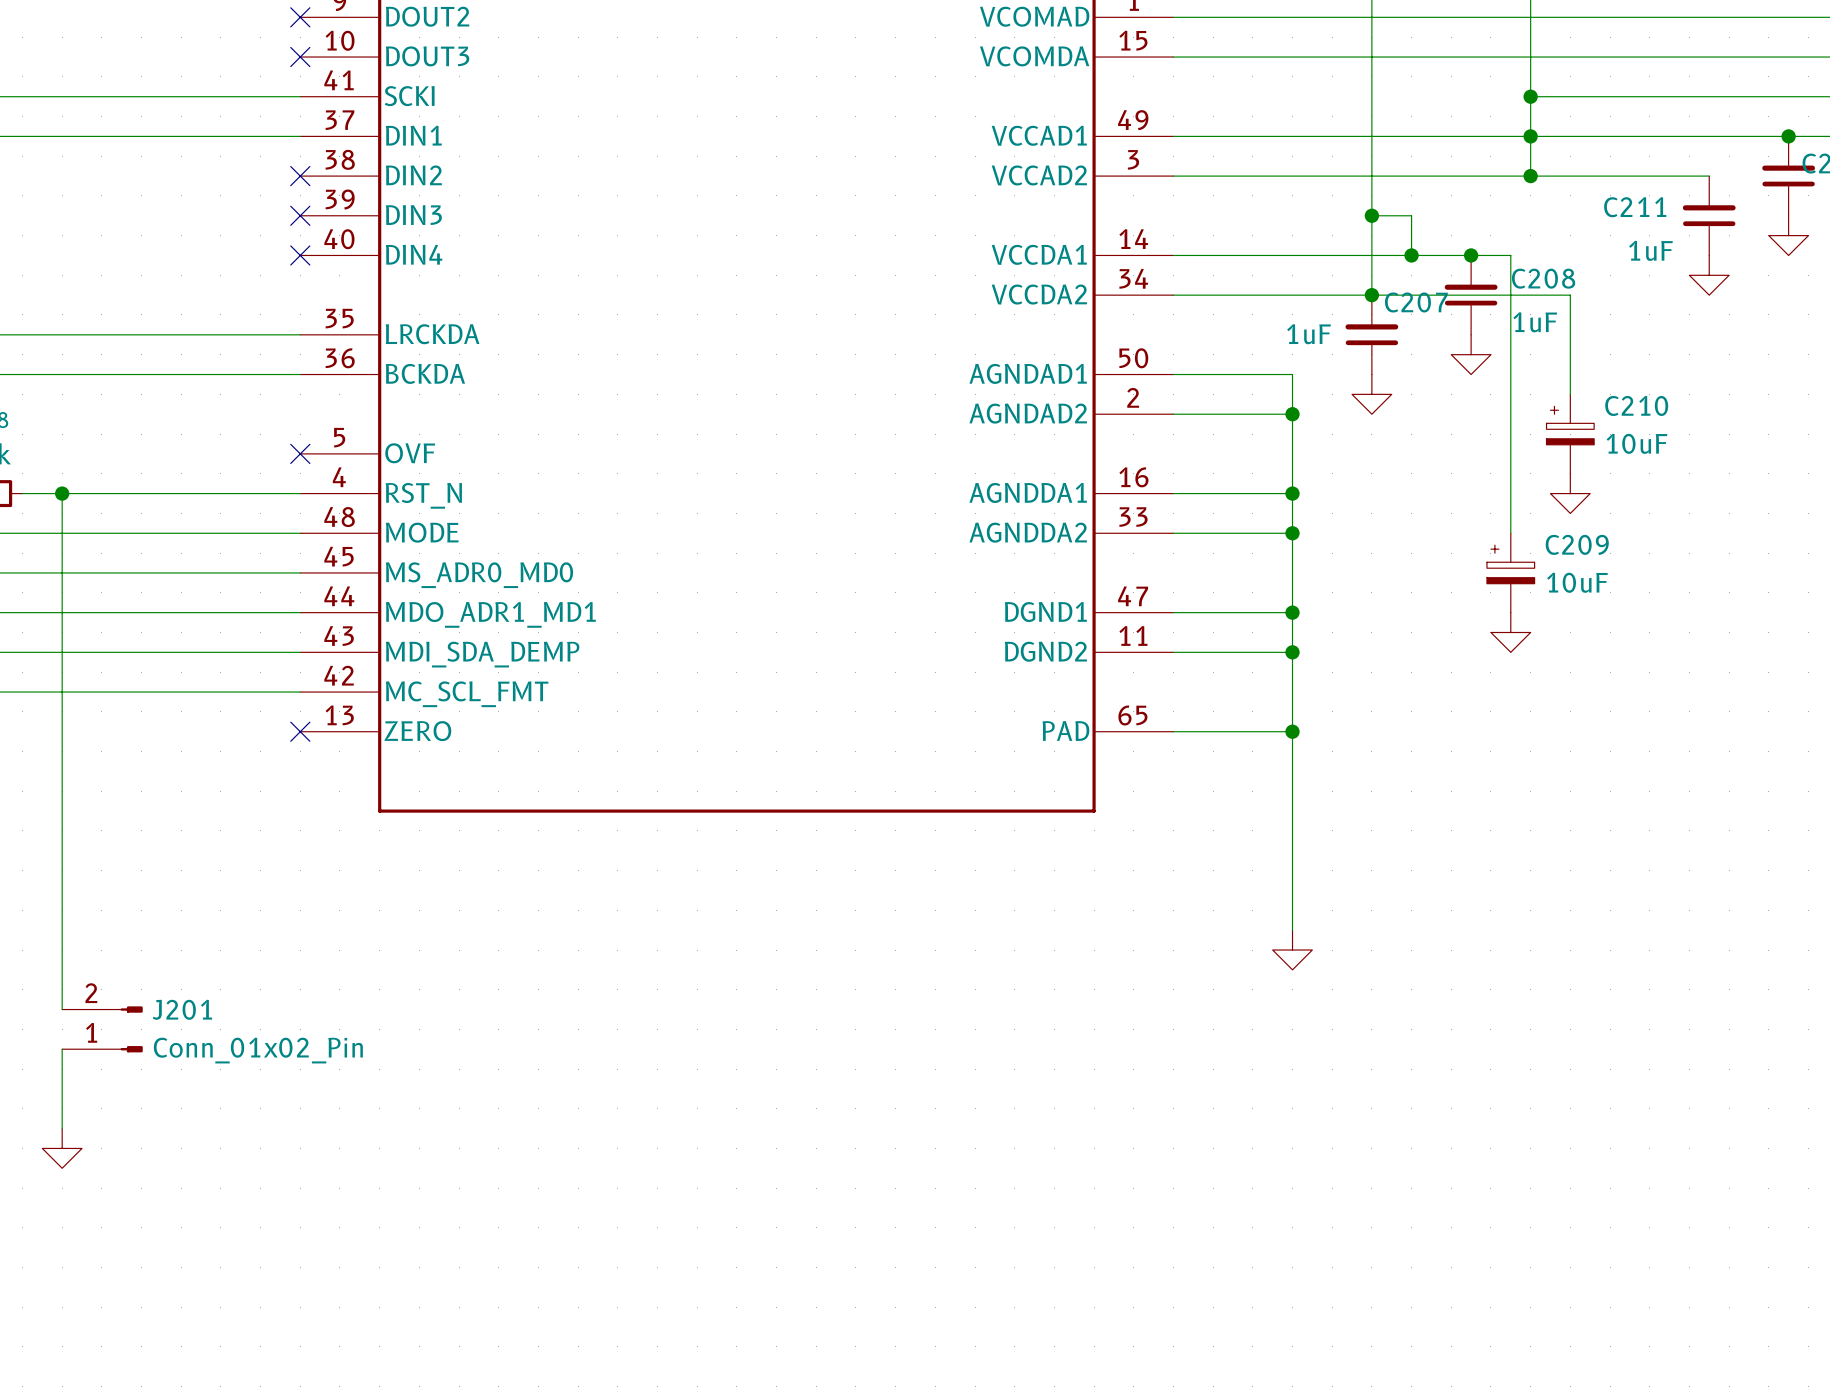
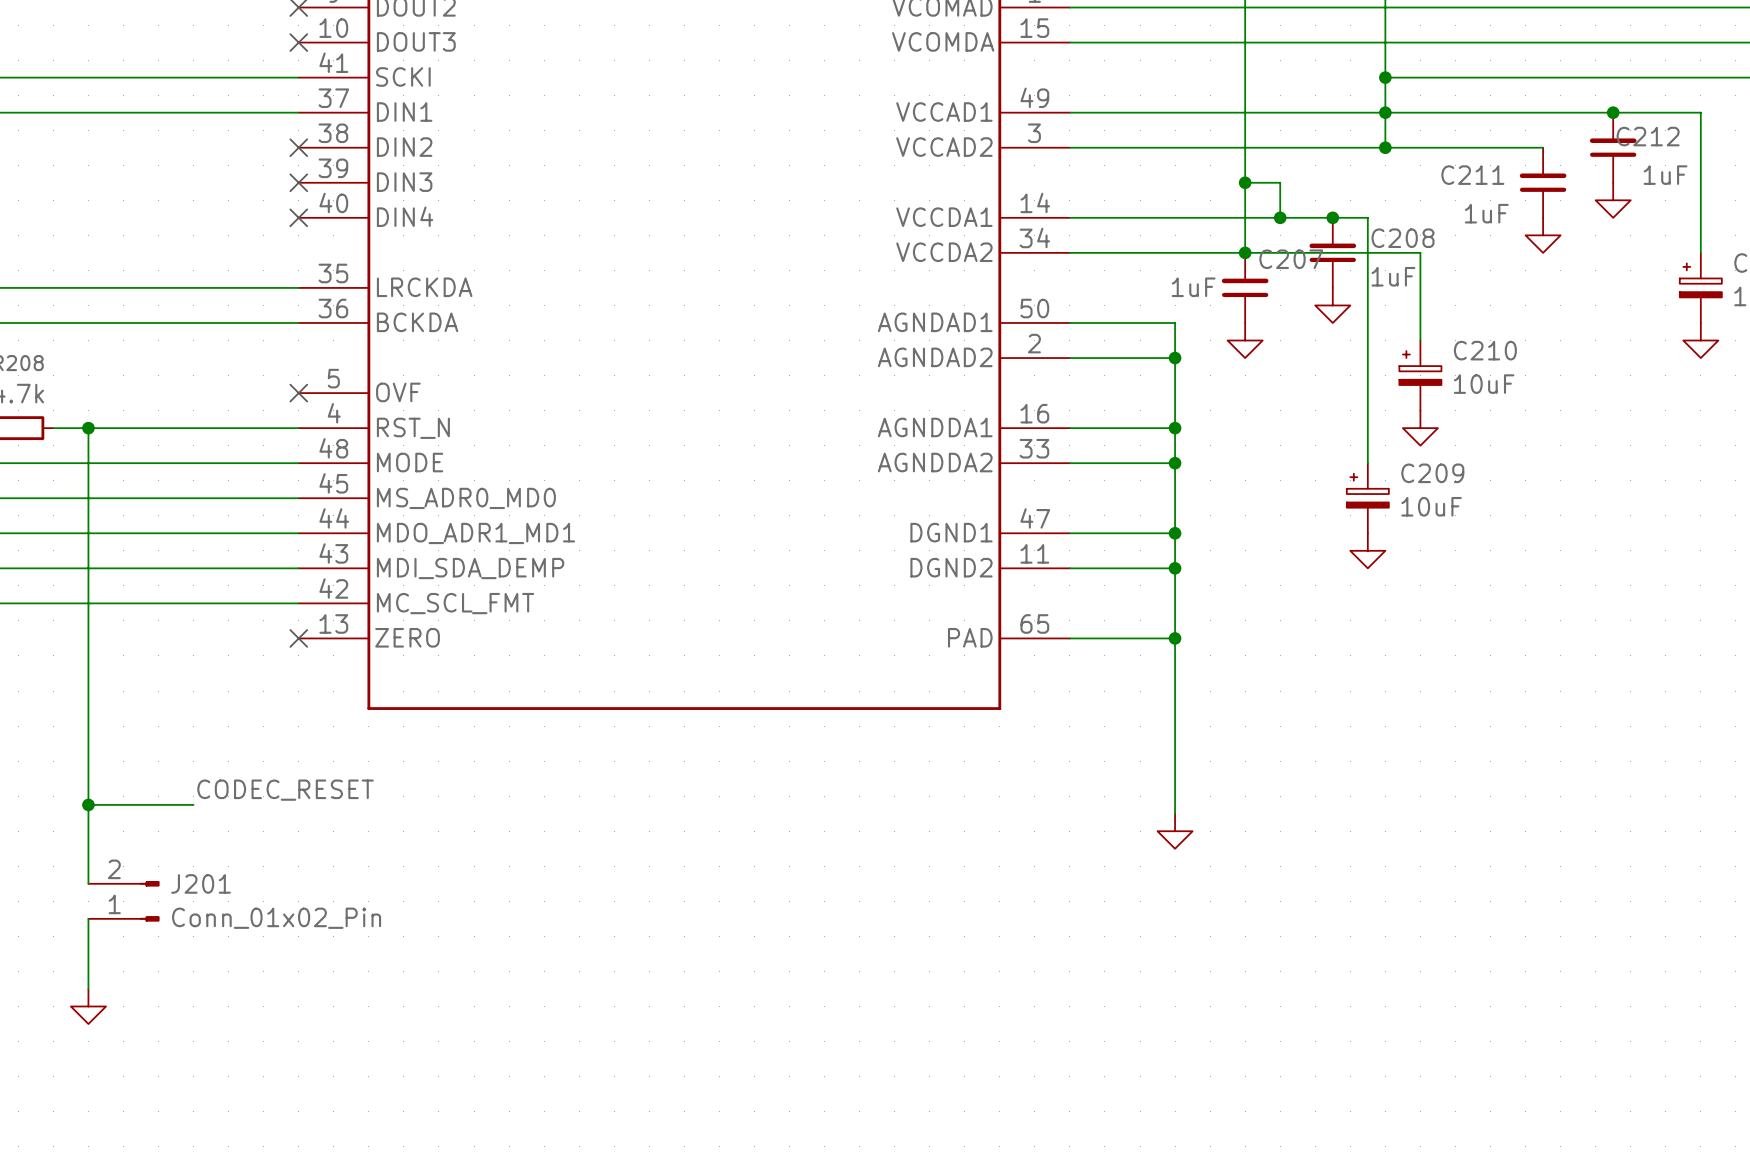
label: none -> CODEC_RESET (285, 790)
wire: none -> (88, 804) (193, 804)
junction: none -> (88, 804)

